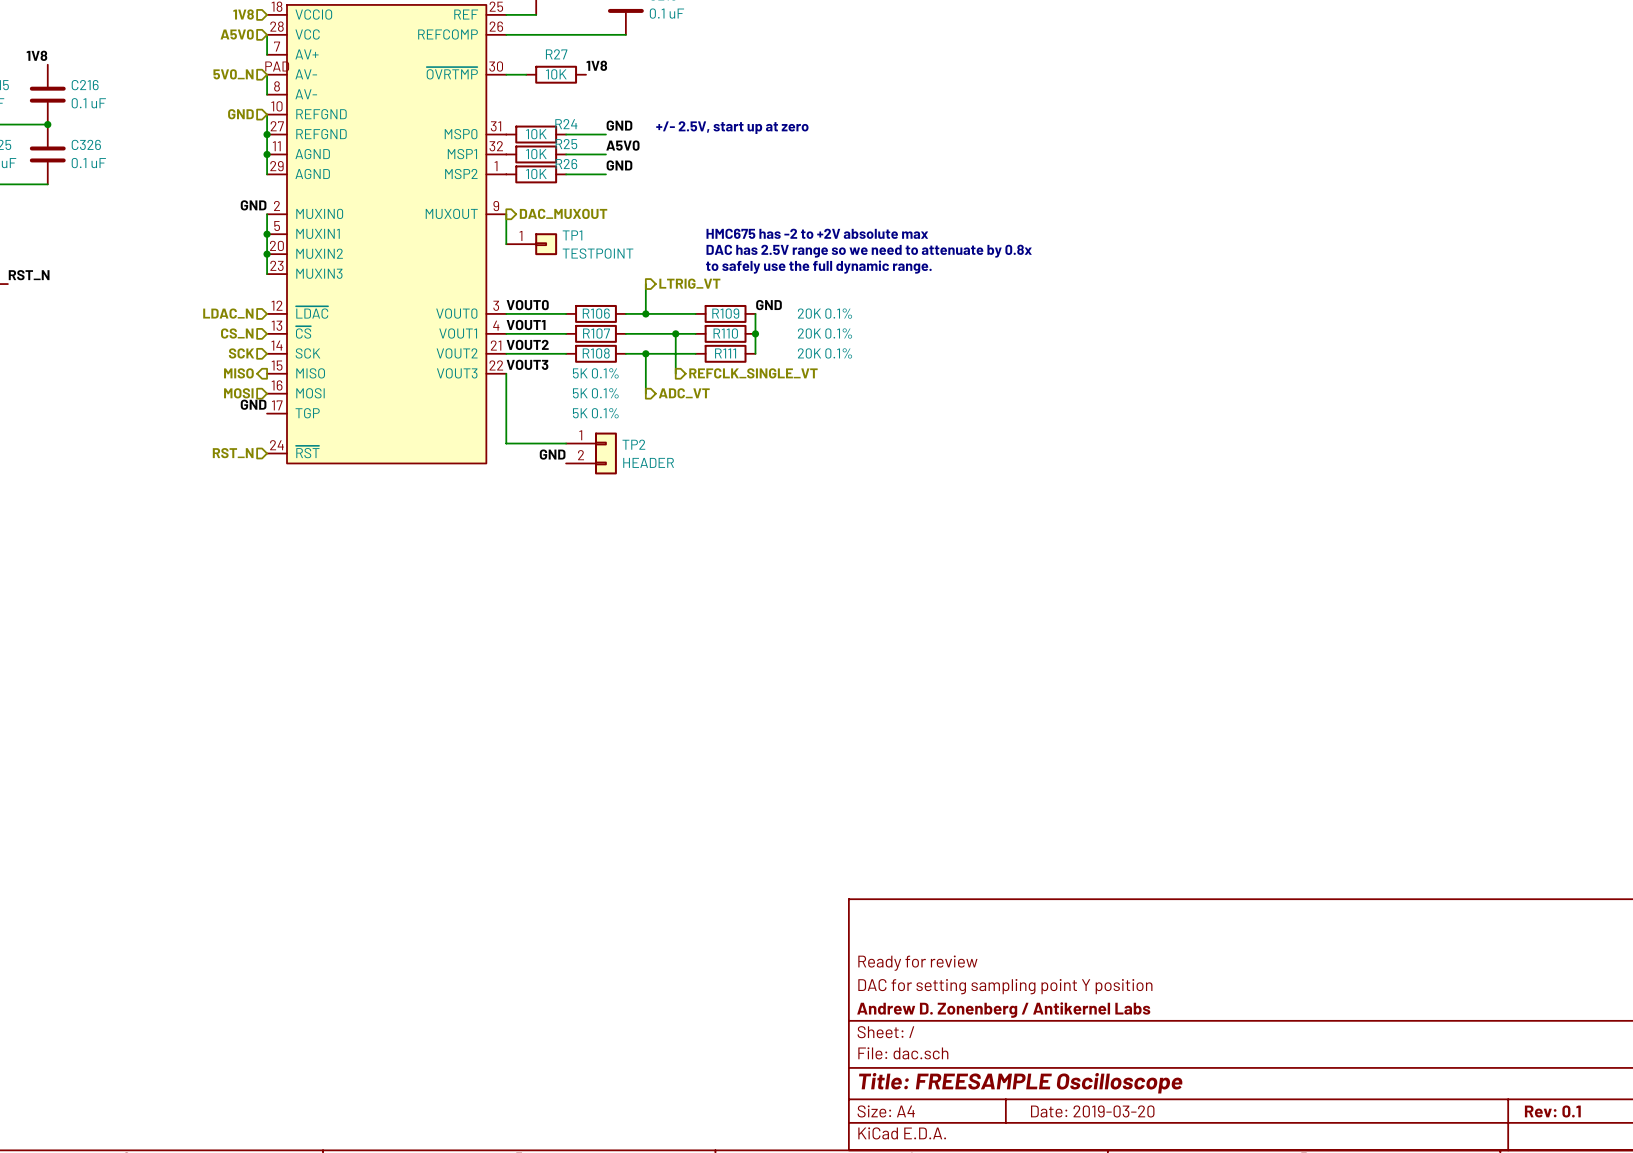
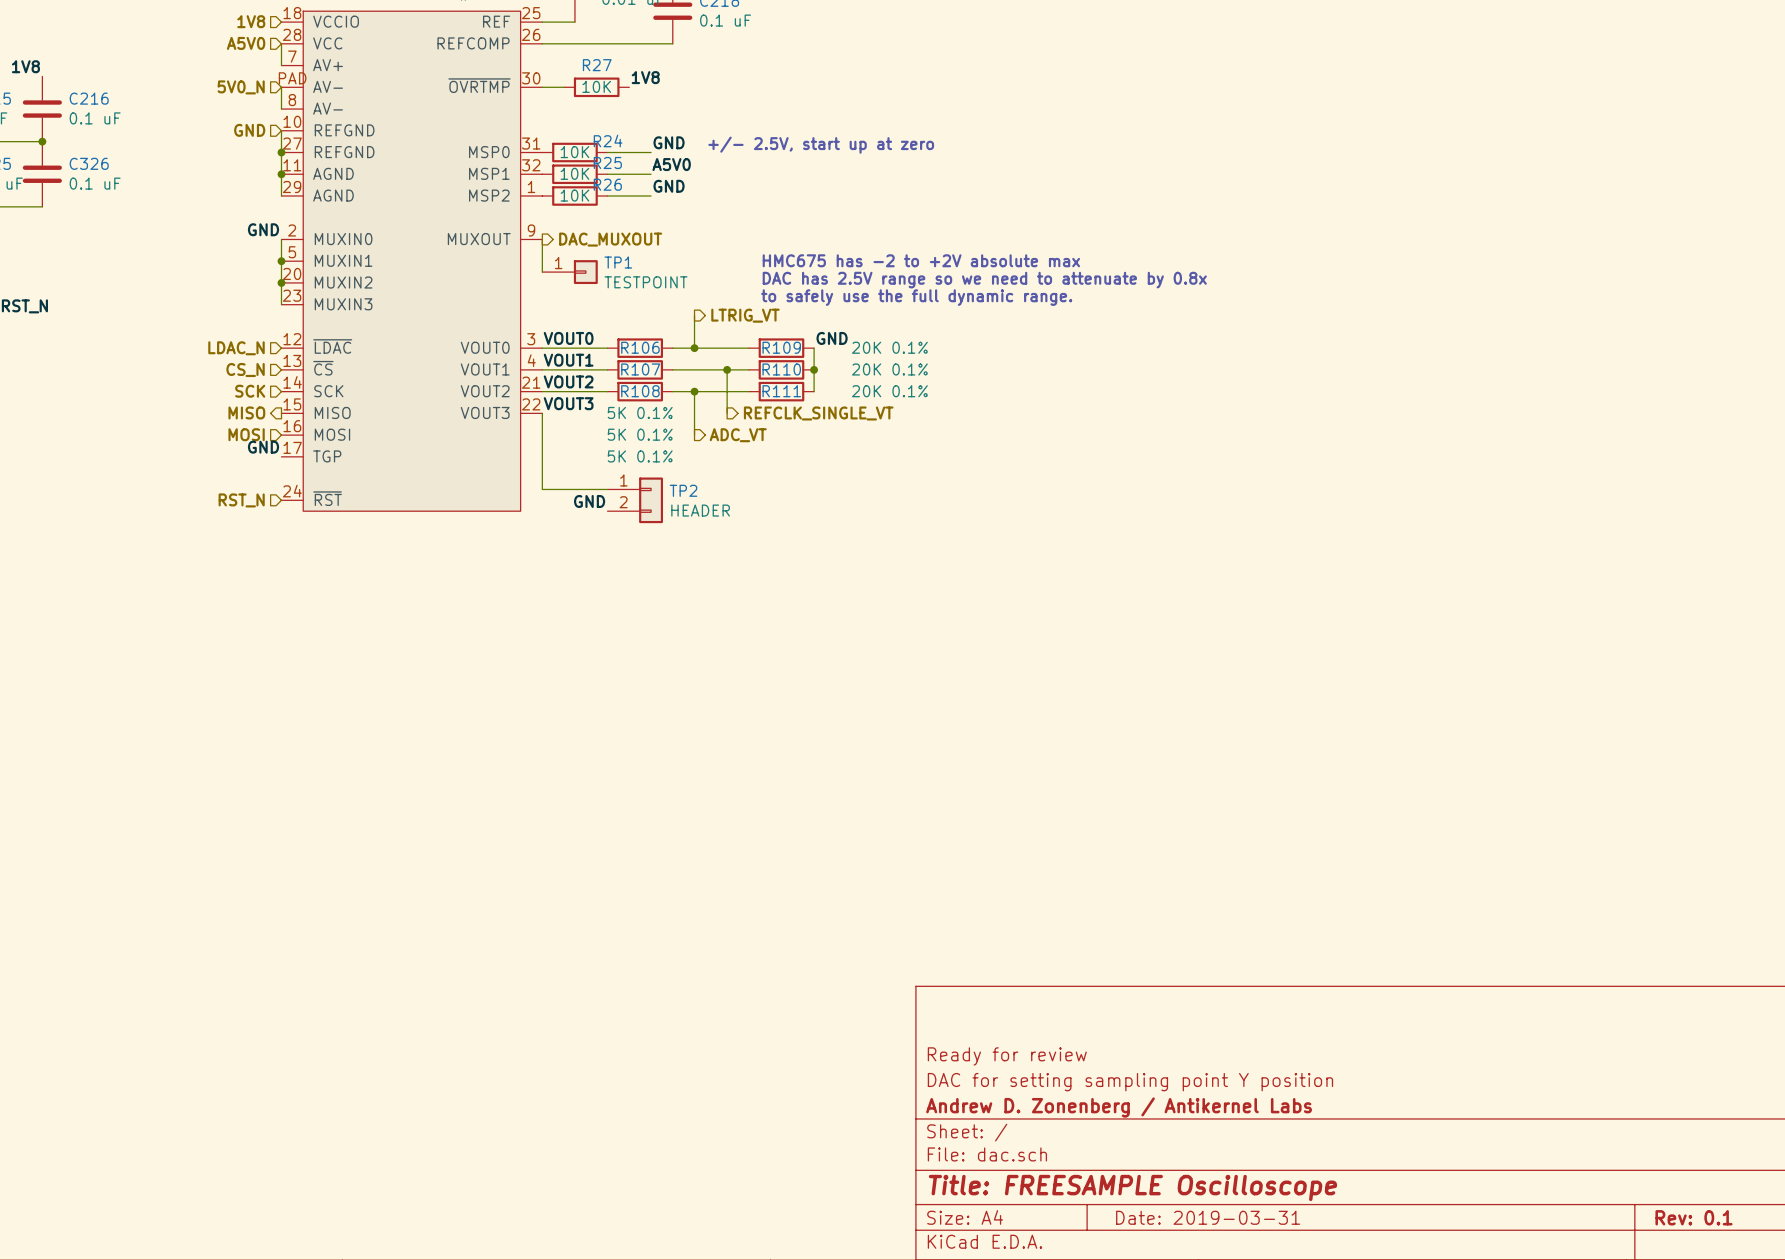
title block: Date: 2019-03-20 (1092, 1111) -> Date: 2019-03-31 (1208, 1217)

